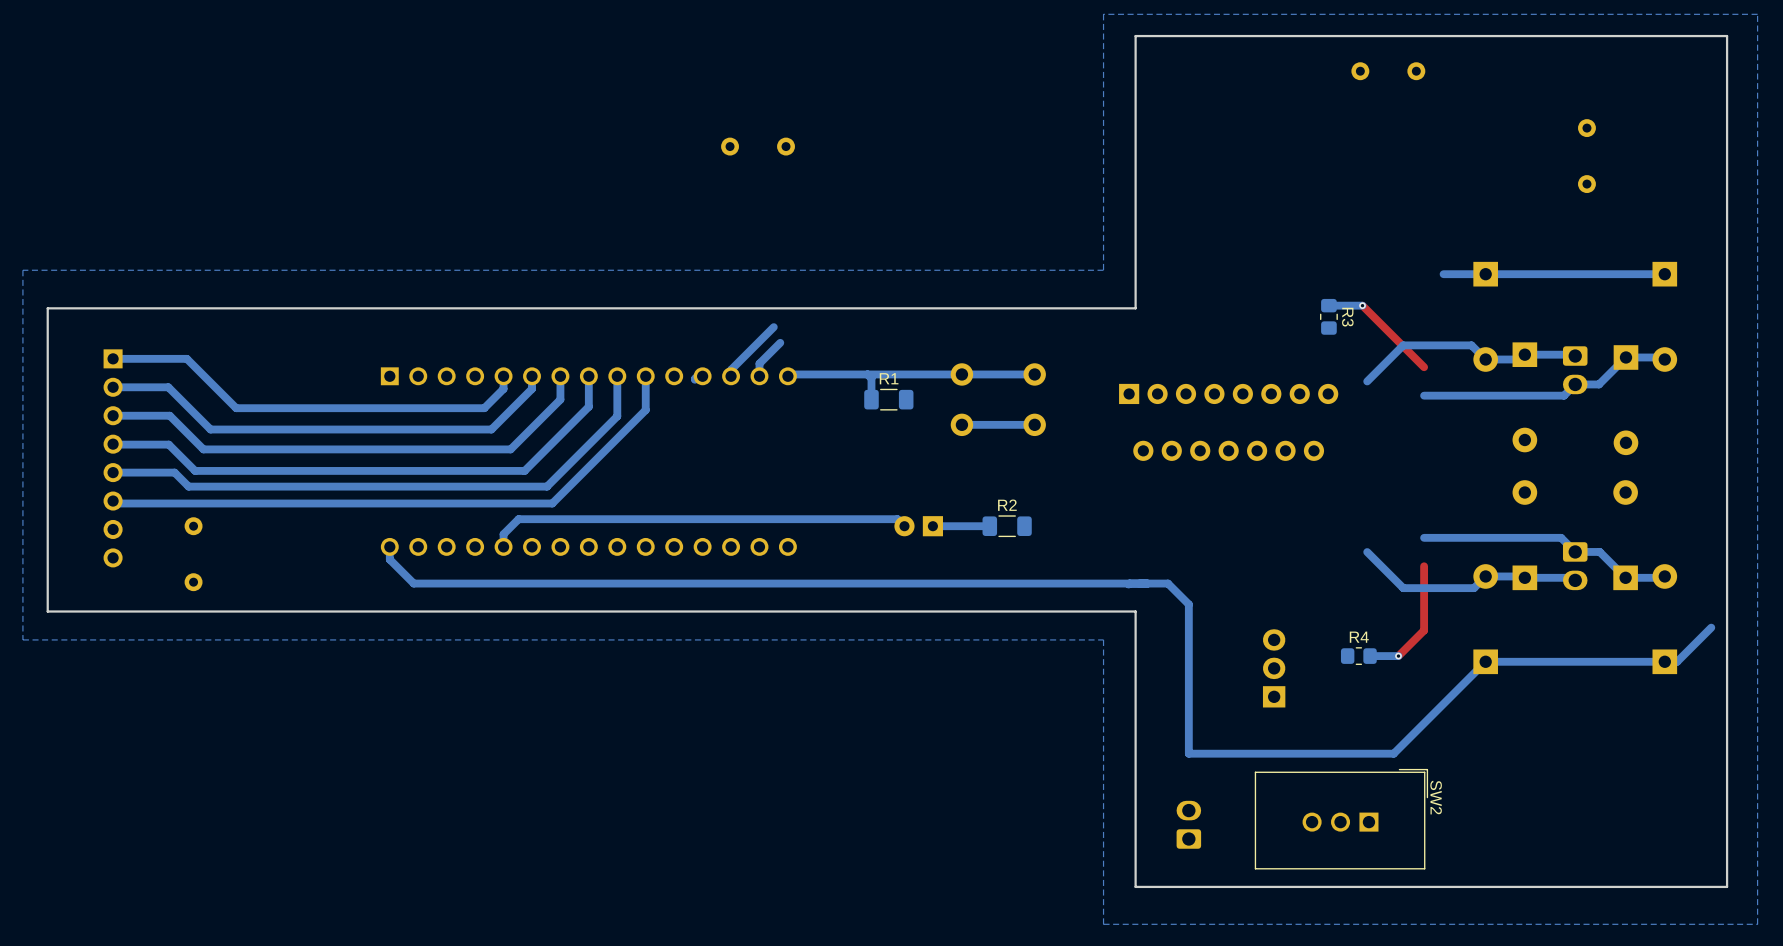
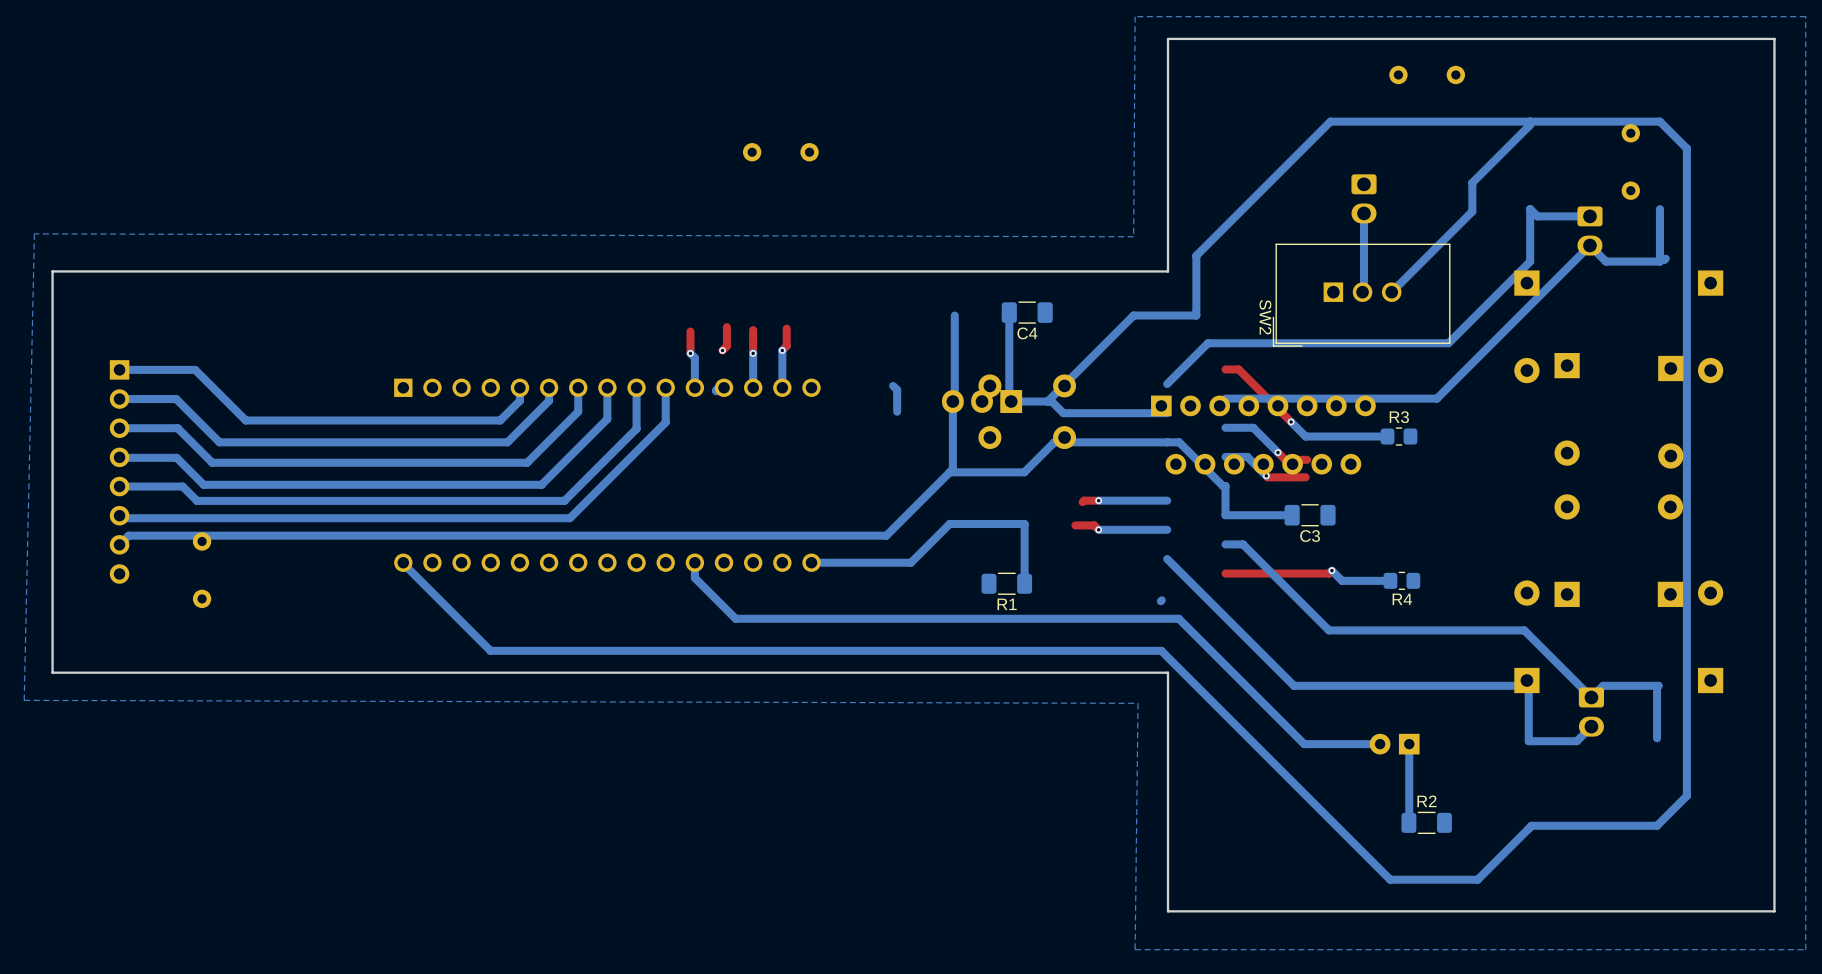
bottom zone outline: (1103, 14) (1103, 270) (22, 270) (22, 639) (1103, 639) (1103, 924) -> (1135, 16) (1133, 236) (34, 233) (24, 700) (1138, 703) (1135, 949)
bottom track: none -> (1530, 121) (1530, 124) (1472, 182) (1472, 211) (1391, 292)
part: none -> (1364, 198)
bottom track: none -> (1659, 209) (1659, 261) (1606, 261) (1589, 245) (1436, 398) (1225, 398)
bottom track: none -> (1364, 213) (1362, 292)
bottom track: none -> (1589, 216) (1537, 216) (1530, 209) (1530, 261) (1448, 343) (1207, 343) (1167, 384)
bottom track: none -> (1665, 258) (1664, 260)
board edge: (1135, 262) (1135, 308) (47, 308) -> (1168, 271) (52, 271) (52, 318)
bottom track: (1664, 274) (1443, 274) -> none
bottom track: none -> (1009, 312) (1009, 399) (1011, 401) (1051, 401) (1063, 413) (1167, 413)
C4: none -> (1027, 312)
bottom track: none -> (954, 315) (952, 469) (886, 535) (128, 535) (119, 544)
bottom track: (1362, 305) (1328, 305) -> none
top track: (1362, 305) (1424, 367) -> none
via: (1362, 305) -> none
R3 rotation: 0° (1328, 316) -> 90° clockwise (1398, 436)
R3 position: (1328, 316) -> (1398, 436)
top track: none -> (726, 327) (726, 346) (722, 350)
R3 name position: R3 (1347, 317) -> R3 (1399, 417)
top track: none -> (786, 328) (786, 346) (782, 350)
top track: none -> (753, 330) (753, 353)
top track: none -> (690, 331) (690, 353)
bottom track: (773, 327) (731, 369) -> (753, 353) (753, 381)
via: none -> (722, 350)
via: none -> (782, 350)
bottom track: none -> (690, 353) (694, 357) (694, 387)
via: none -> (690, 353)
via: none -> (753, 353)
bottom track: (780, 342) (759, 363) -> (782, 350) (782, 374)
bottom track: (1575, 356) (1524, 354) (1520, 359) (1485, 359) (1471, 345) (1403, 345) (1367, 381) -> none
top track: none -> (1225, 369) (1238, 369) (1291, 421)
bottom track: (1664, 359) (1662, 357) (1625, 357) (1599, 384) (1575, 384) (1564, 395) (1424, 395) -> none
part position: (1575, 370) -> (1589, 230)
bottom track: (1034, 374) (789, 374) (787, 376) -> none
R1 name position: R1 (889, 378) -> R1 (1007, 604)
part: none -> (982, 401)
R1 position: (888, 399) -> (1006, 583)
bottom track: none -> (1291, 421) (1305, 436) (1387, 436)
via: none -> (1291, 421)
bottom track: none -> (1225, 427) (1253, 427) (1277, 452)
bottom track: (1034, 424) (961, 424) -> none
top track: none -> (1277, 452) (1285, 459) (1307, 459)
via: none -> (1277, 452)
bottom track: none -> (1225, 456) (1247, 456) (1266, 475)
bottom track: none -> (949, 472) (1024, 472) (1054, 442) (1179, 442) (1222, 486) (1225, 486) (1225, 515) (1292, 515)
top track: none -> (1266, 475) (1305, 477)
via: none -> (1266, 475)
top track: none -> (1098, 500) (1082, 502)
via: none -> (1098, 500)
bottom track: none -> (1167, 500) (1098, 500)
C3: none -> (1310, 515)
top track: none -> (1075, 525) (1094, 525) (1098, 529)
via: none -> (1098, 529)
bottom track: none -> (1167, 529) (1098, 529)
bottom track: (904, 526) (897, 519) (518, 519) (503, 534) (503, 546) -> none
part: (918, 526) -> none
bottom track: (989, 526) (937, 526) -> none
R2 position: (1007, 526) -> (1426, 822)
bottom track: none -> (1225, 544) (1243, 544) (1329, 630) (1524, 630) (1591, 697)
bottom track: (1424, 537) (1561, 537) (1575, 551) (1599, 551) (1625, 577) (1664, 576) -> none
bottom track: none -> (1167, 558) (1294, 685) (1528, 685) (1528, 741) (1576, 741) (1591, 726)
bottom track: none -> (694, 562) (694, 577) (735, 618) (1178, 618) (1304, 744) (1380, 744)
bottom track: (389, 547) (389, 559) (413, 583) (1167, 583) (1188, 604) (1188, 753) (1393, 753) (1485, 661) (1677, 661) (1711, 627) -> (403, 563) (490, 650) (1161, 650) (1390, 879) (1477, 879) (1531, 825) (1657, 825) (1686, 795) (1686, 148) (1659, 121) (1330, 121) (1196, 255) (1196, 315) (1133, 315) (1047, 401)
bottom track: none -> (811, 562) (910, 562) (949, 523) (1024, 523) (1024, 583)
bottom track: (1367, 552) (1403, 588) (1474, 588) (1485, 576) (1572, 577) (1575, 580) -> none
bottom track: none -> (1331, 570) (1342, 580) (1390, 580)
top track: none -> (1331, 570) (1329, 573) (1225, 573)
via: none -> (1331, 570)
top track: (1424, 566) (1424, 630) (1398, 656) -> none
part position: (1575, 566) -> (1591, 712)
board edge: (47, 611) (1135, 611) (1135, 886) -> (52, 628) (52, 672) (1168, 672) (1168, 911)
R4 name position: R4 (1359, 637) -> R4 (1402, 599)
R4 position: (1358, 656) -> (1401, 580)
bottom track: (1398, 656) (1370, 656) -> none
via: (1398, 656) -> none
part: (1274, 668) -> none
bottom track: none -> (1591, 697) (1603, 685) (1658, 685) (1657, 738)
part: none -> (1394, 744)
bottom track: none -> (1409, 744) (1408, 822)
SW2 rotation: 0° (1341, 819) -> 180° (1361, 295)
SW2 position: (1341, 819) -> (1361, 295)
part: (1188, 824) -> none

